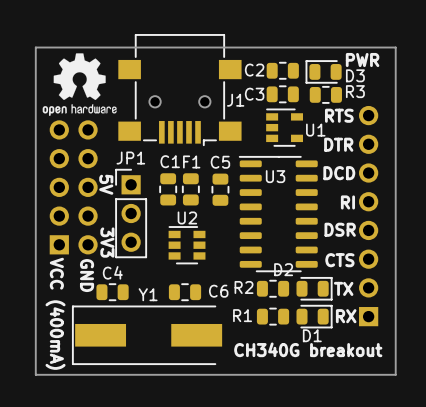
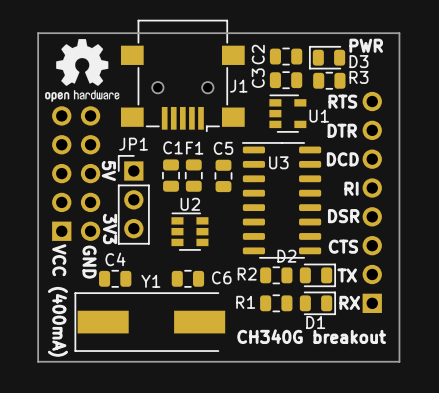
C2 name rotation: 0° (254, 70) -> 90° counterclockwise (258, 54)
C3 name rotation: 0° (254, 94) -> 90° counterclockwise (258, 78)

